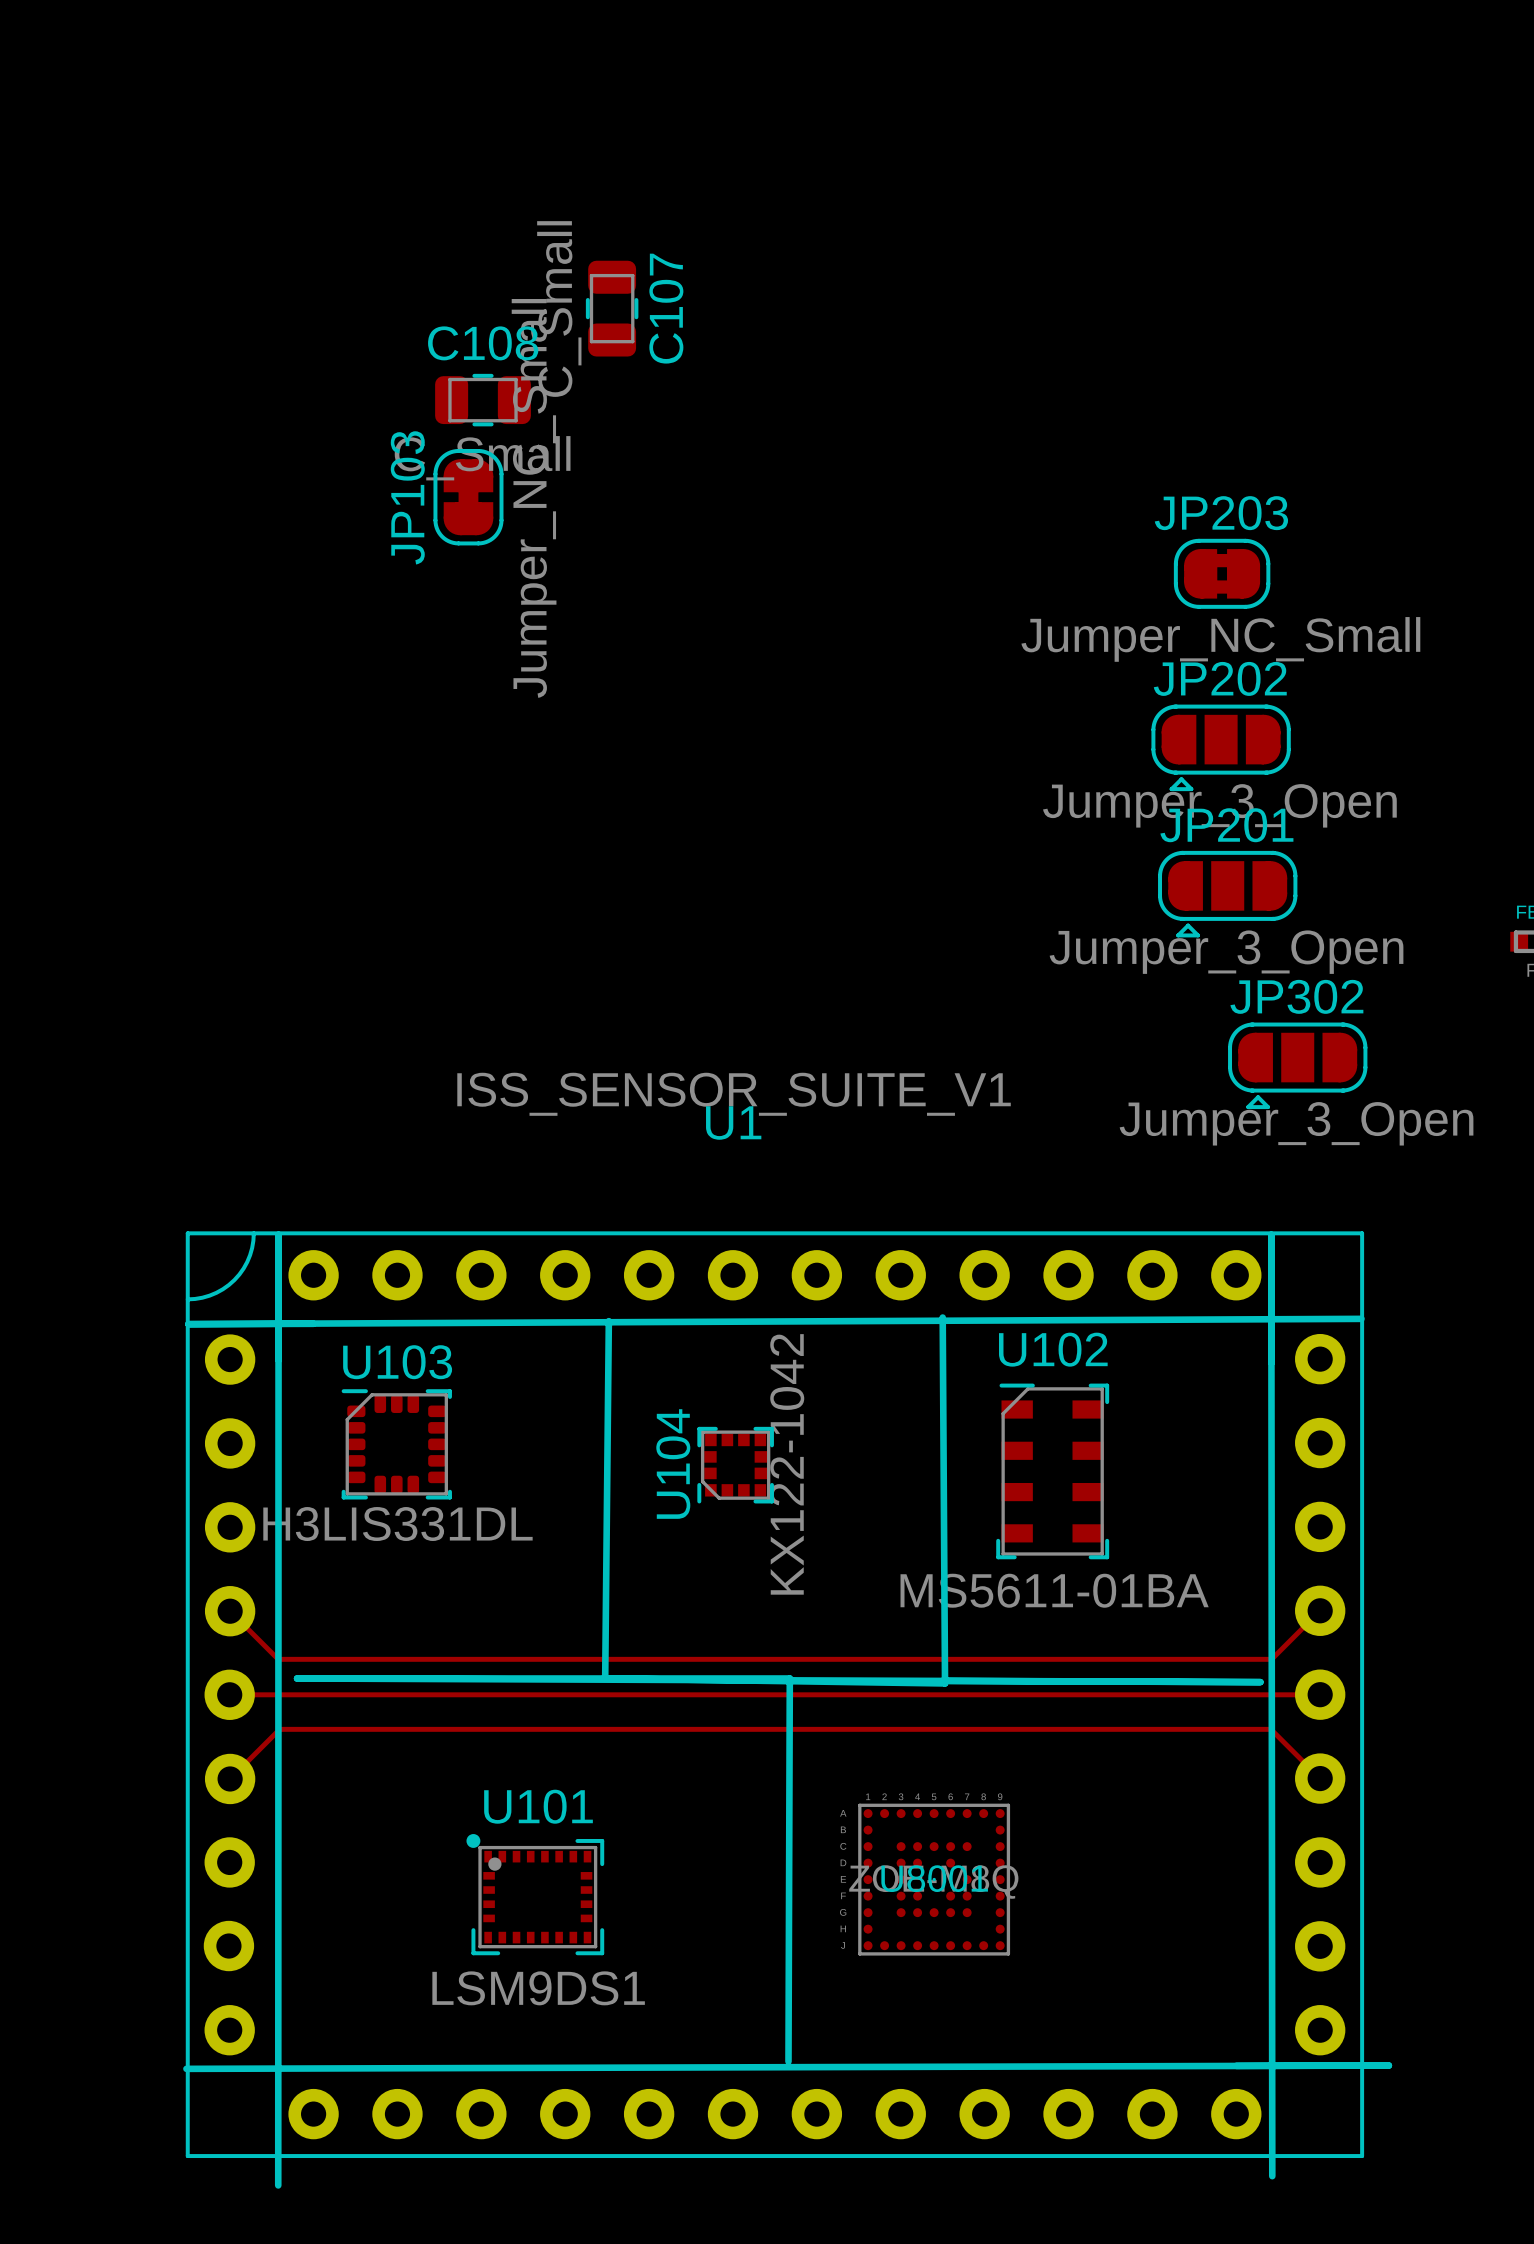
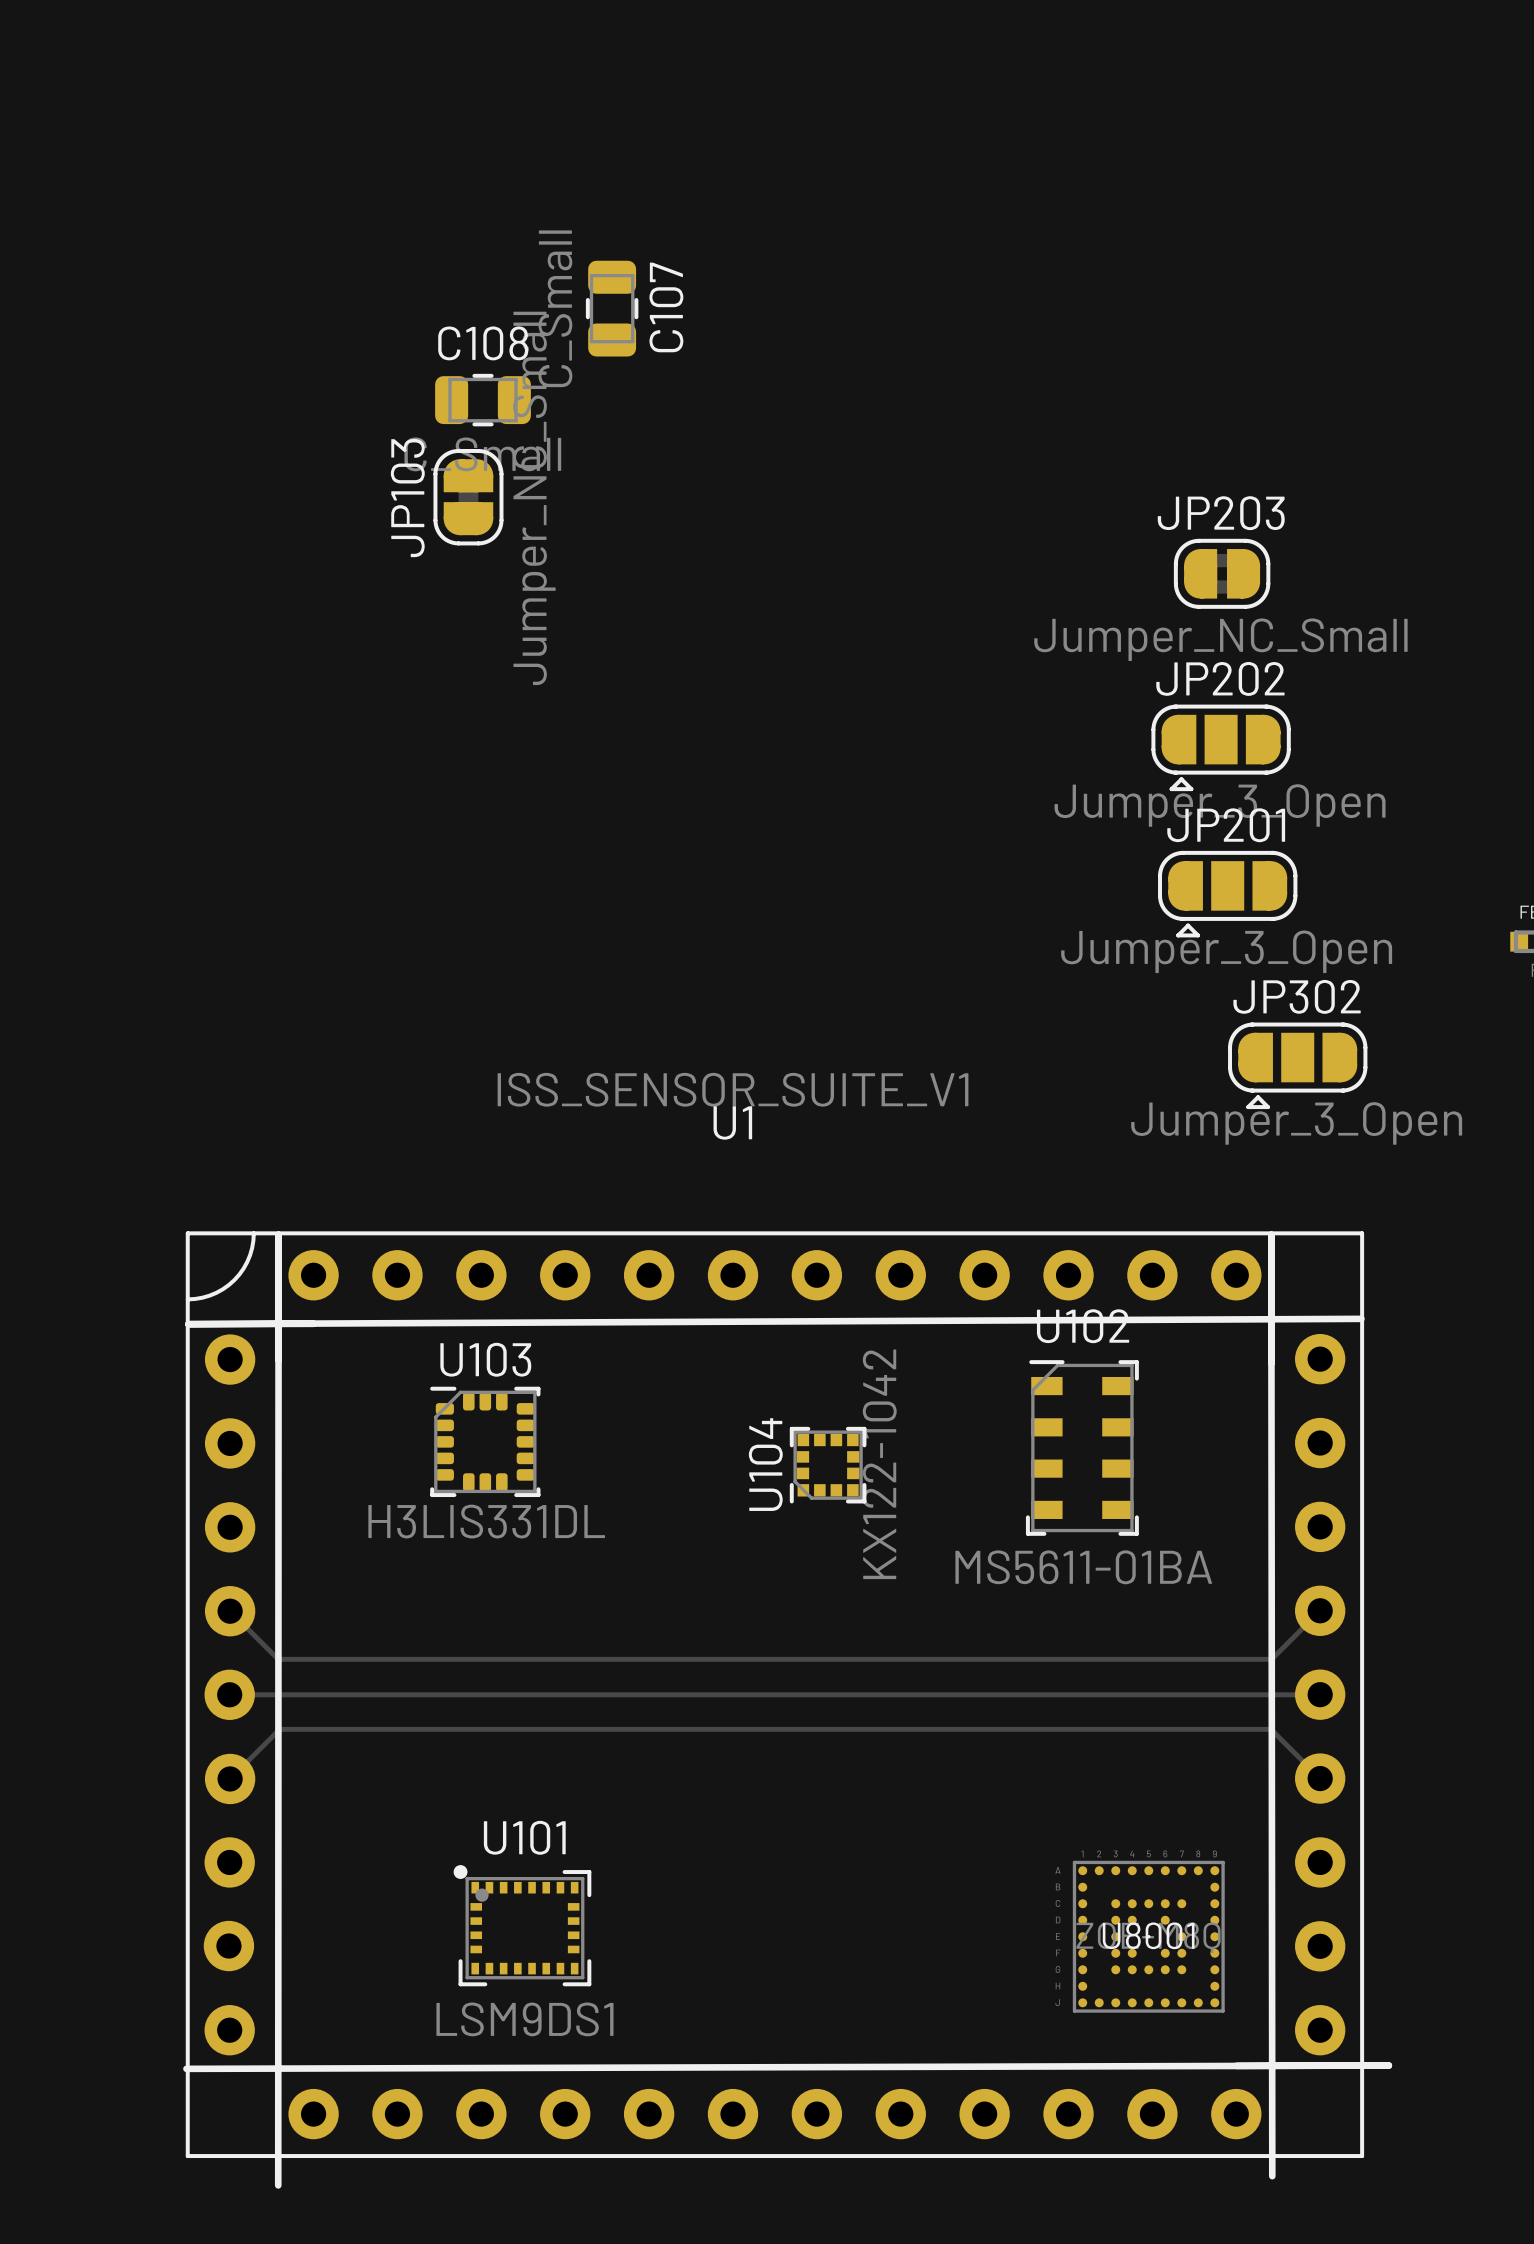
line: (942, 1317) (945, 1683) (605, 1678) (608, 1321) -> none
U103 position: (396, 1444) -> (485, 1441)
U104 position: (735, 1465) -> (828, 1465)
U102 position: (1052, 1471) -> (1082, 1447)
line: (947, 1680) (1260, 1682) (297, 1678) (789, 1678) (788, 2061) -> none
U8001 position: (934, 1879) -> (1148, 1936)
U101 position: (535, 1894) -> (522, 1925)

